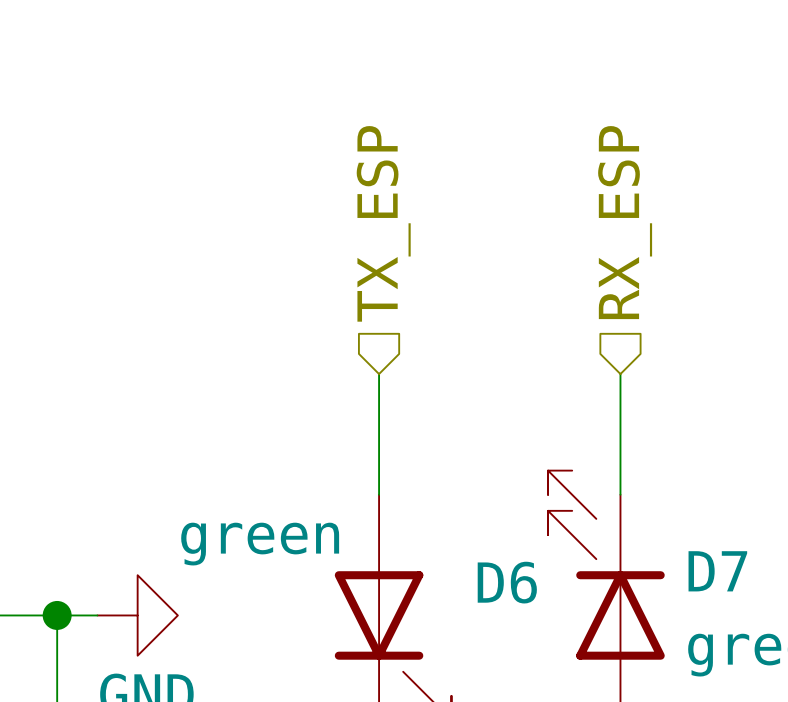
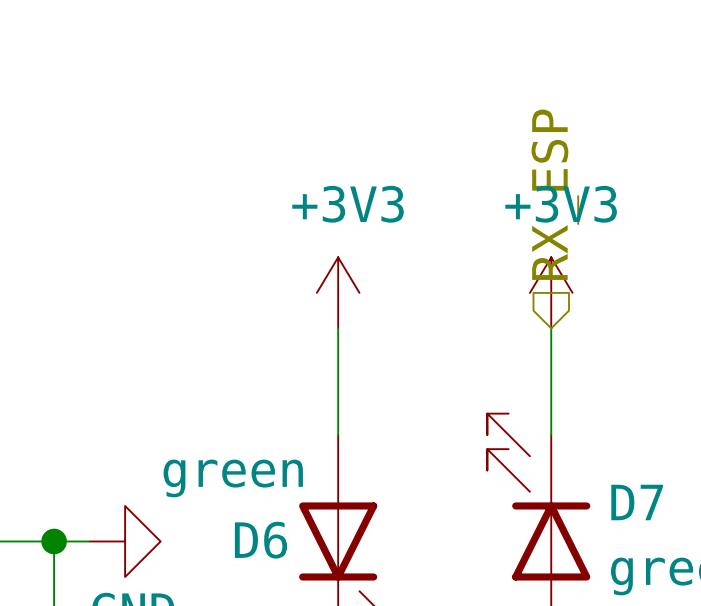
hierarchical label: TX_ESP (383, 223) -> none
power symbol: none -> +3V3 (338, 292)
power symbol: none -> +3V3 (551, 292)
D6 name position: D6 (507, 582) -> D6 (261, 540)

